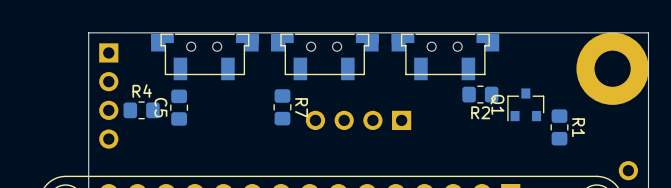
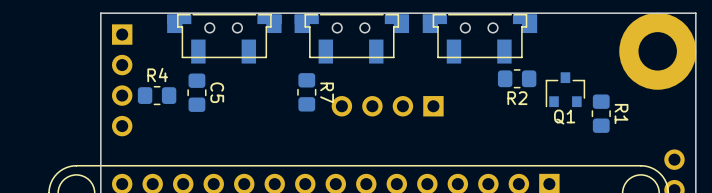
Q1 name rotation: 0° (497, 104) -> 90° counterclockwise (564, 117)
Q1 name position: Q1 (497, 104) -> Q1 (564, 117)
C5 name position: C5 (160, 107) -> C5 (217, 92)

